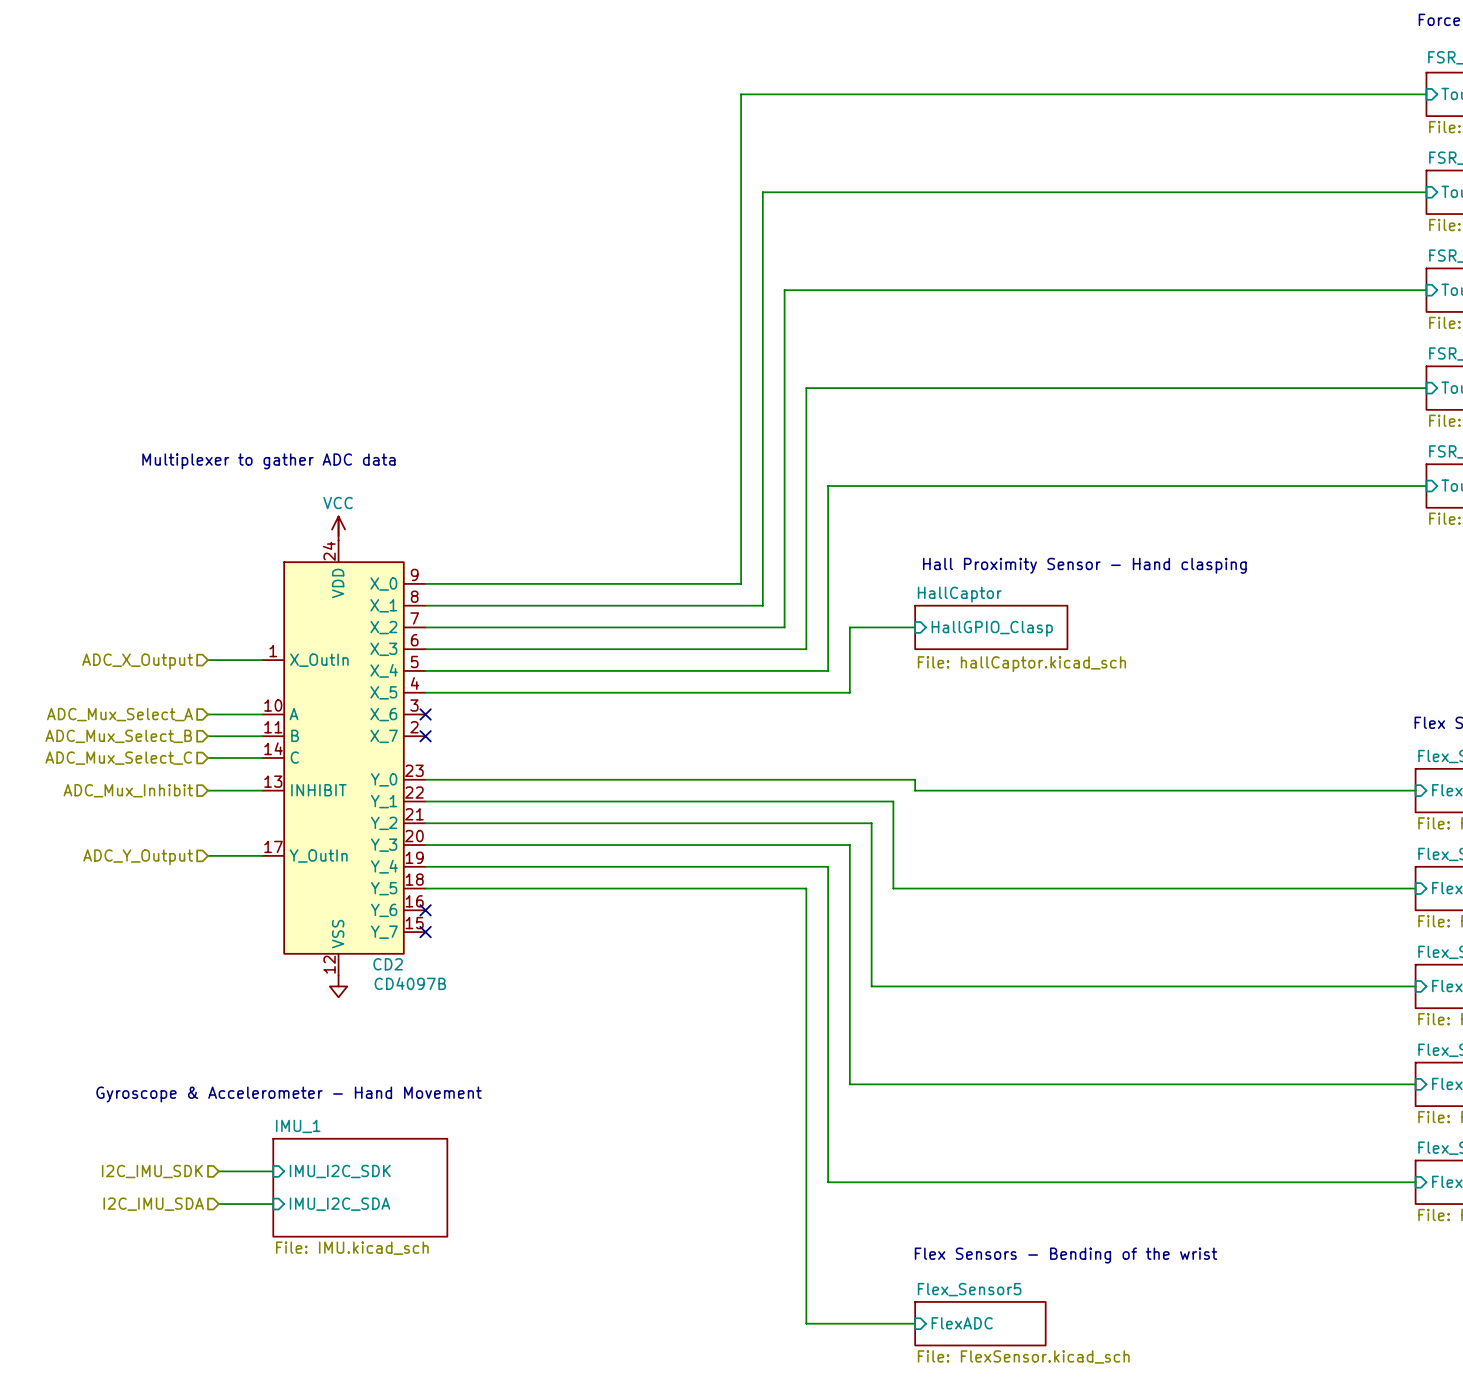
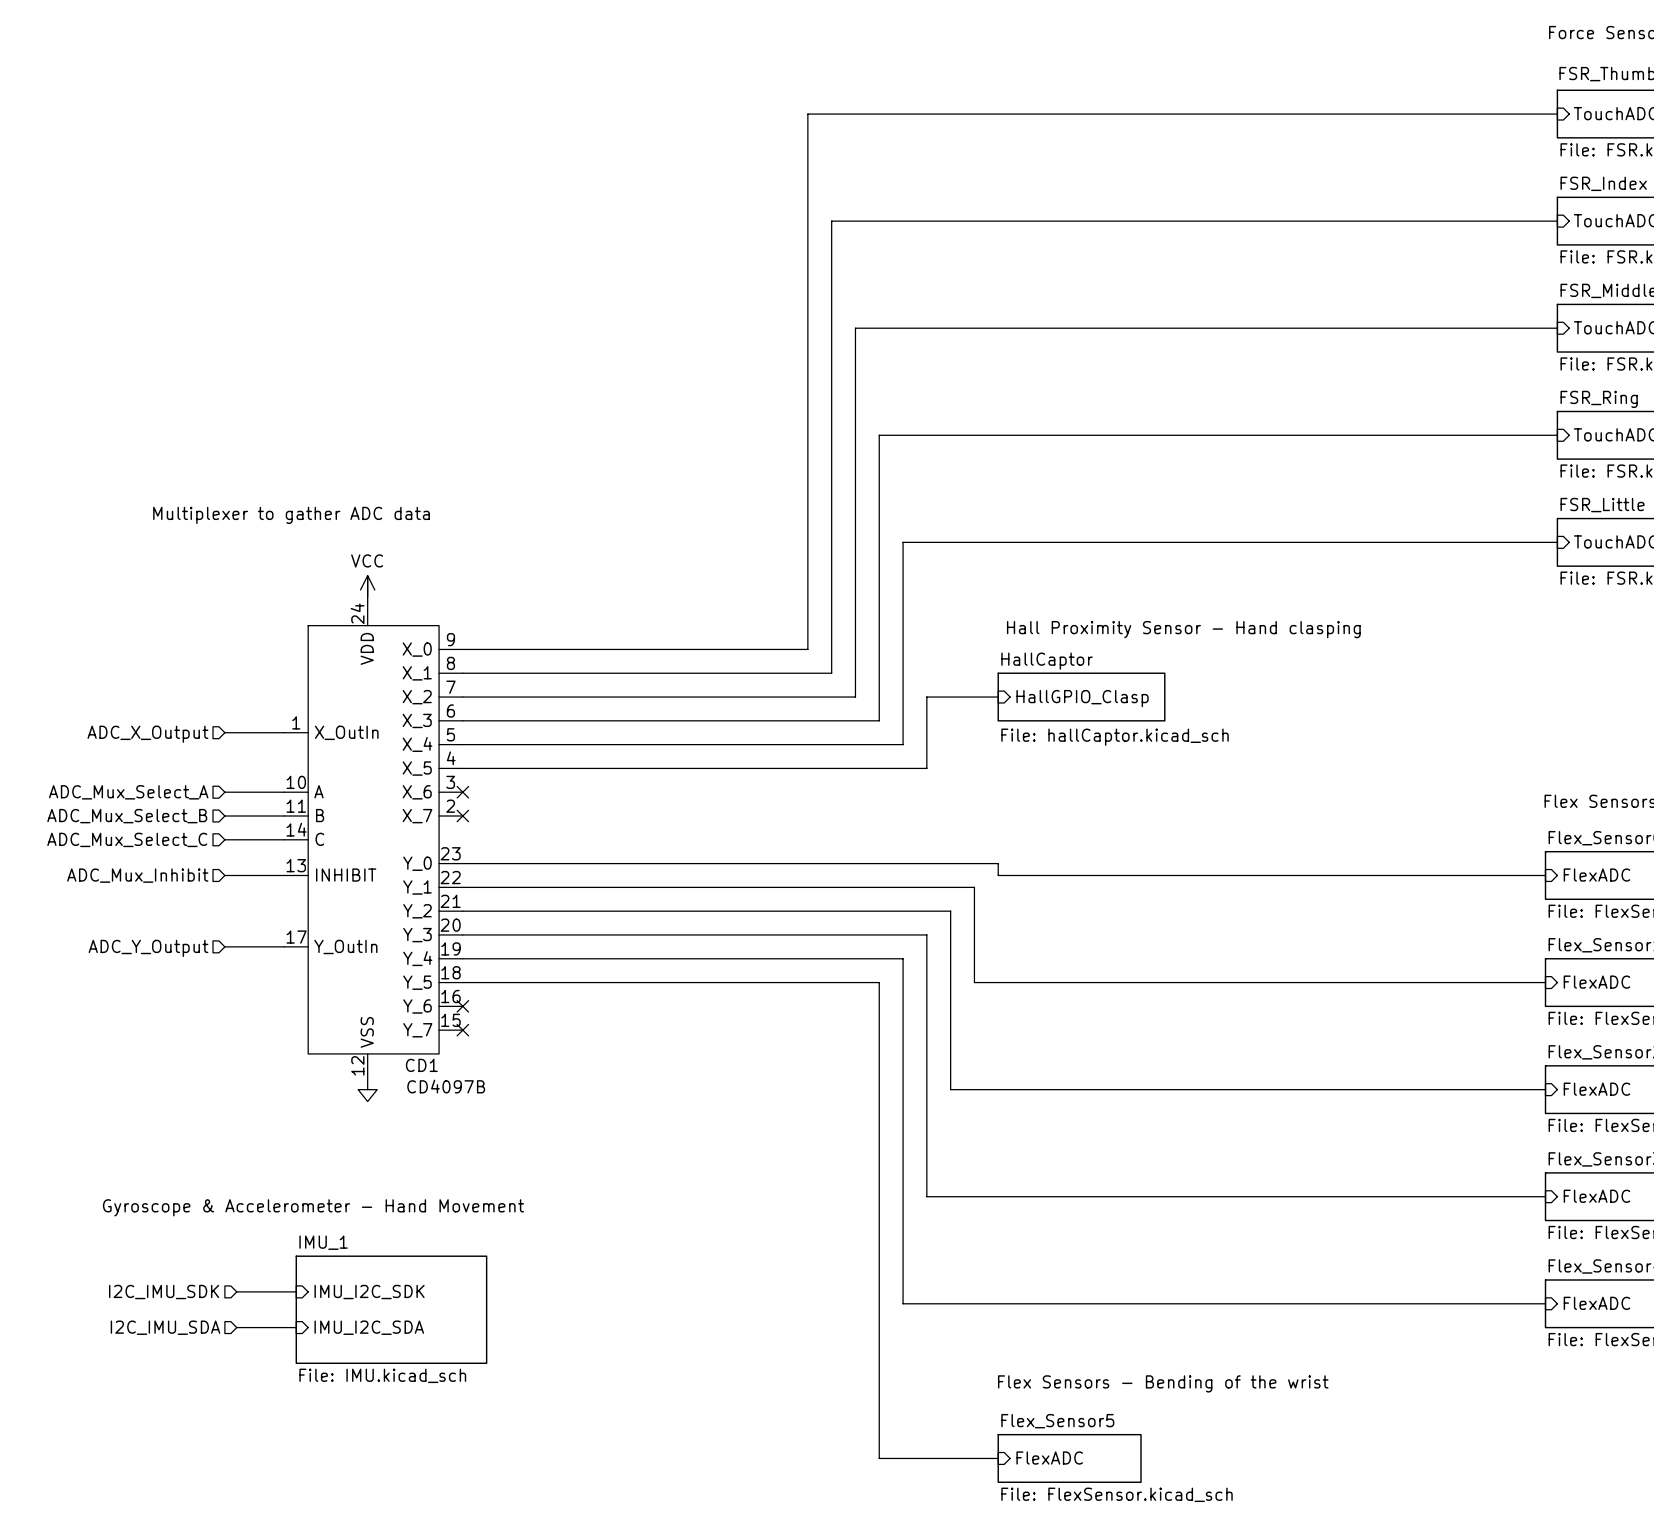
CD2 name: CD2 (388, 964) -> CD1 (421, 1065)

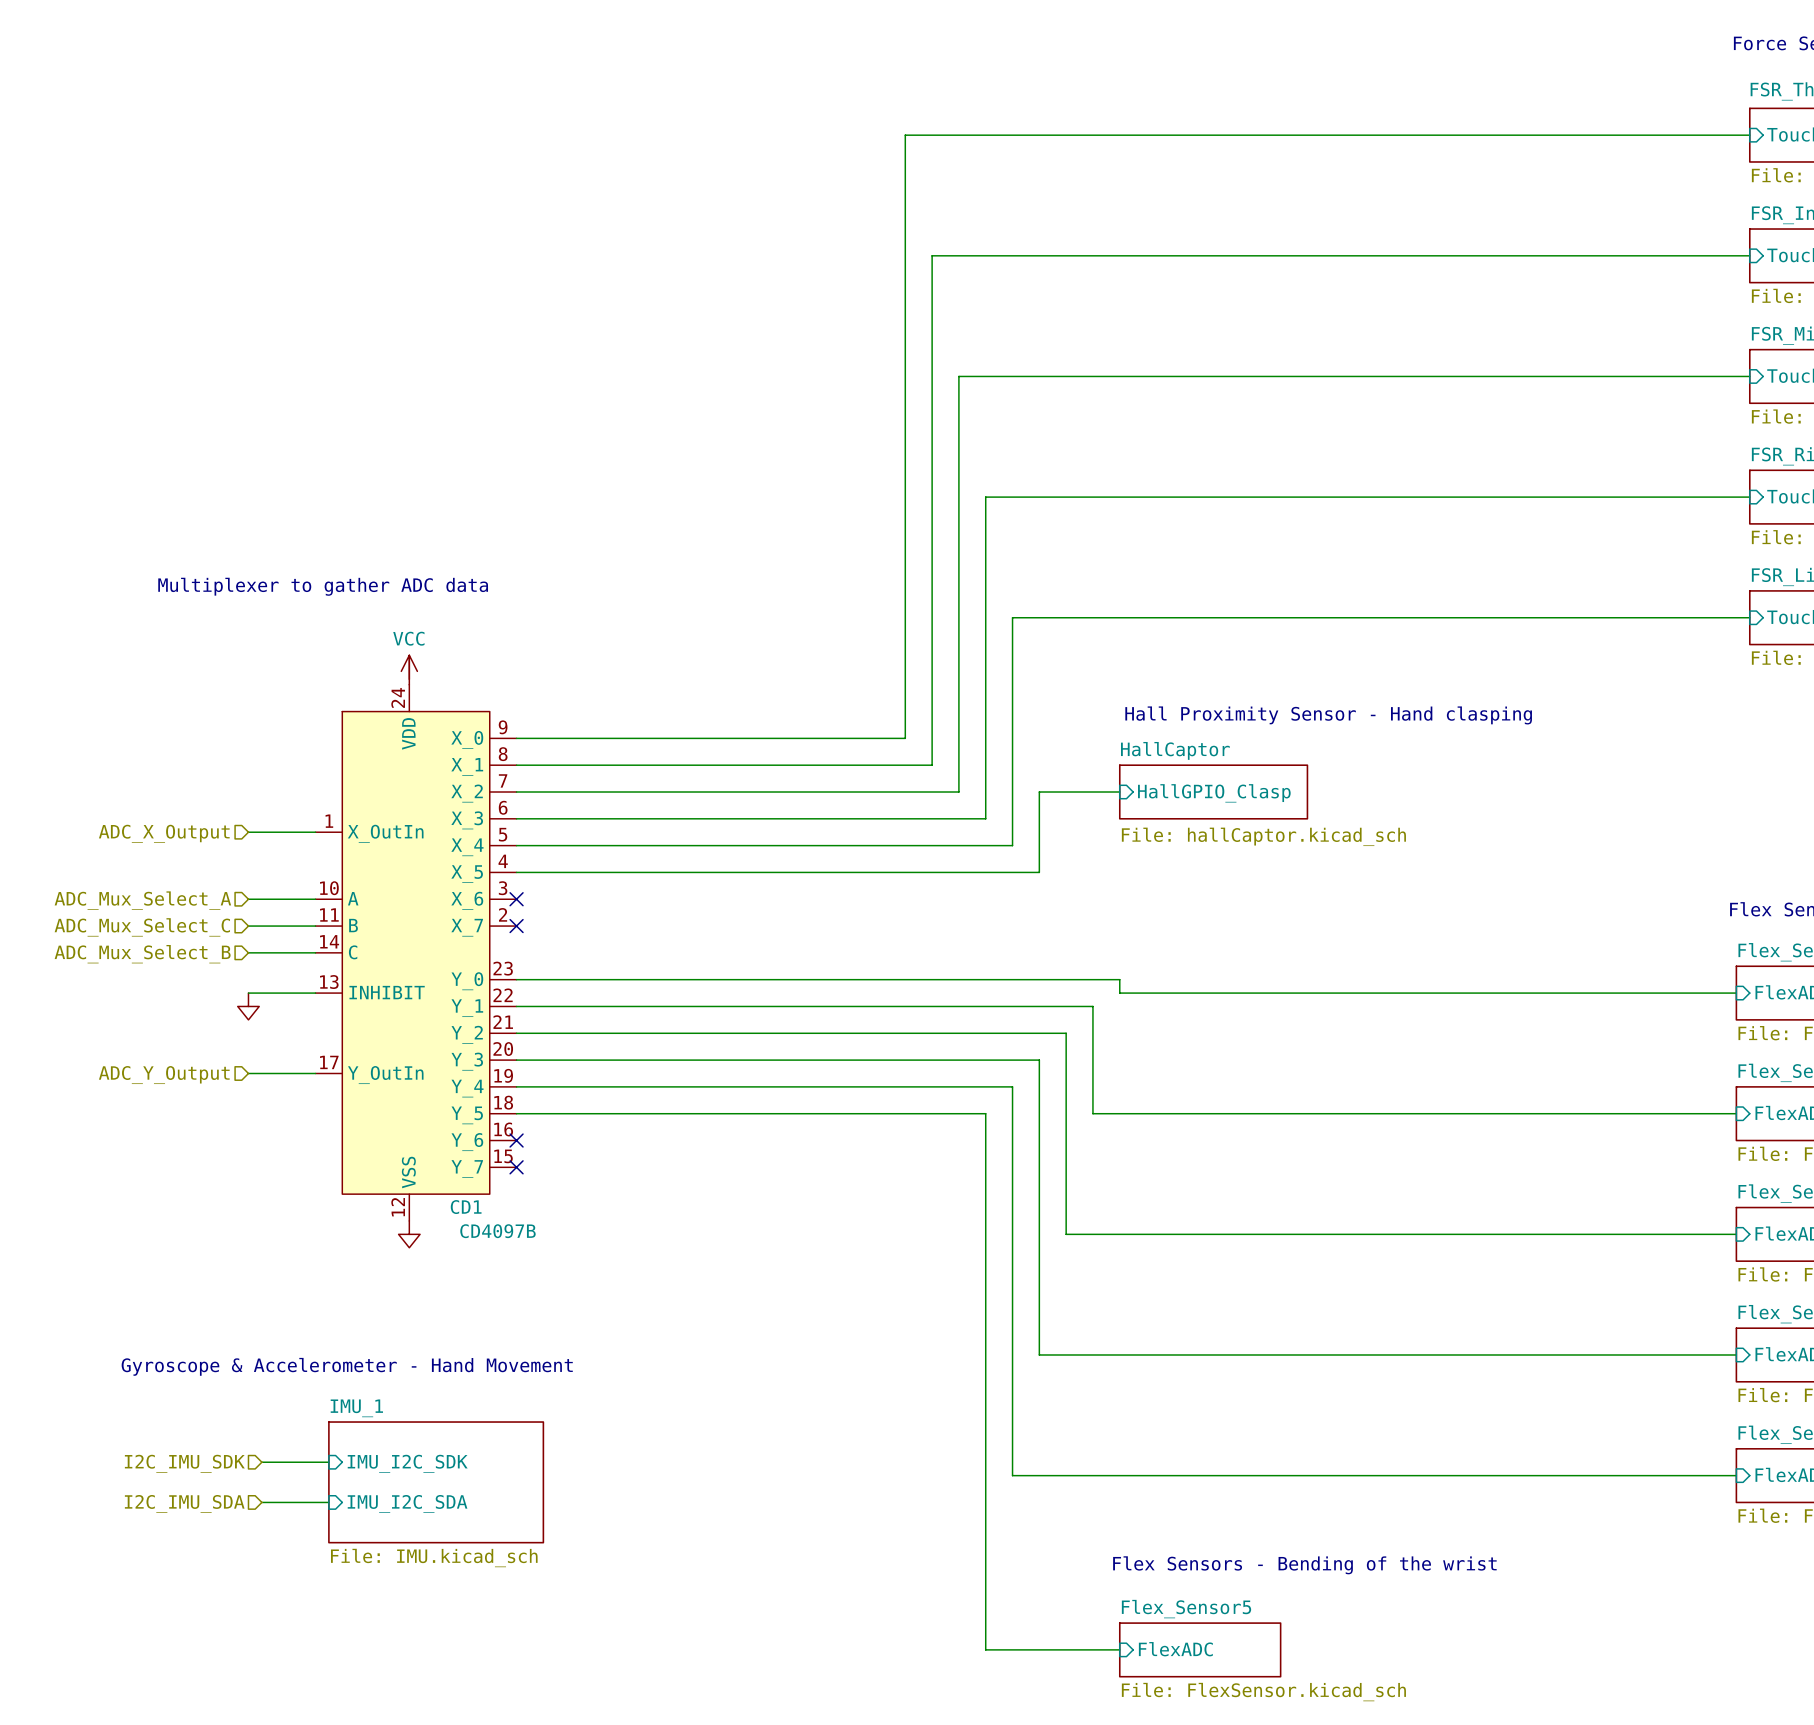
hierarchical label: ADC_Mux_Select_B (127, 816) -> ADC_Mux_Select_C (142, 927)
hierarchical label: ADC_Mux_Select_C (127, 839) -> ADC_Mux_Select_B (142, 954)
hierarchical label: ADC_Mux_Inhibit (137, 875) -> none
power symbol: none -> (248, 1006)

